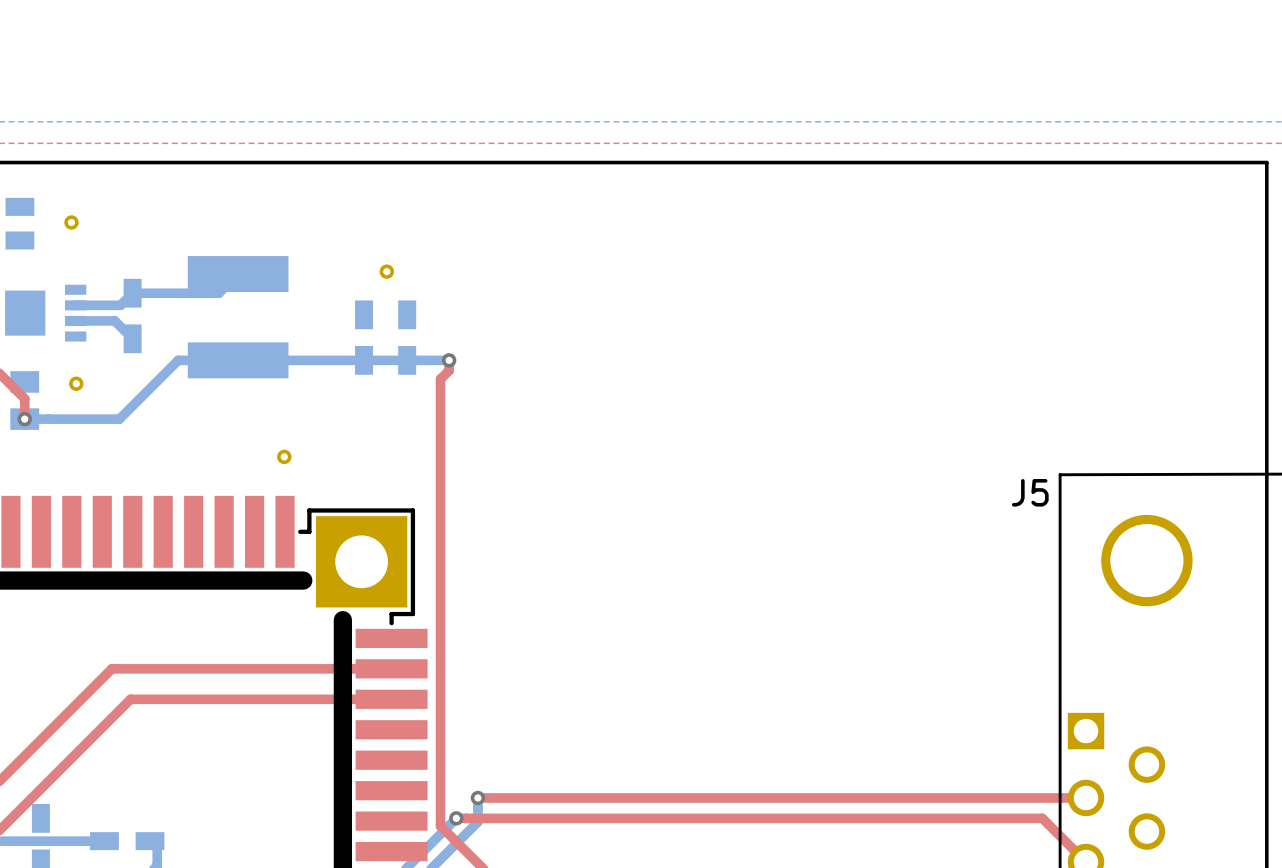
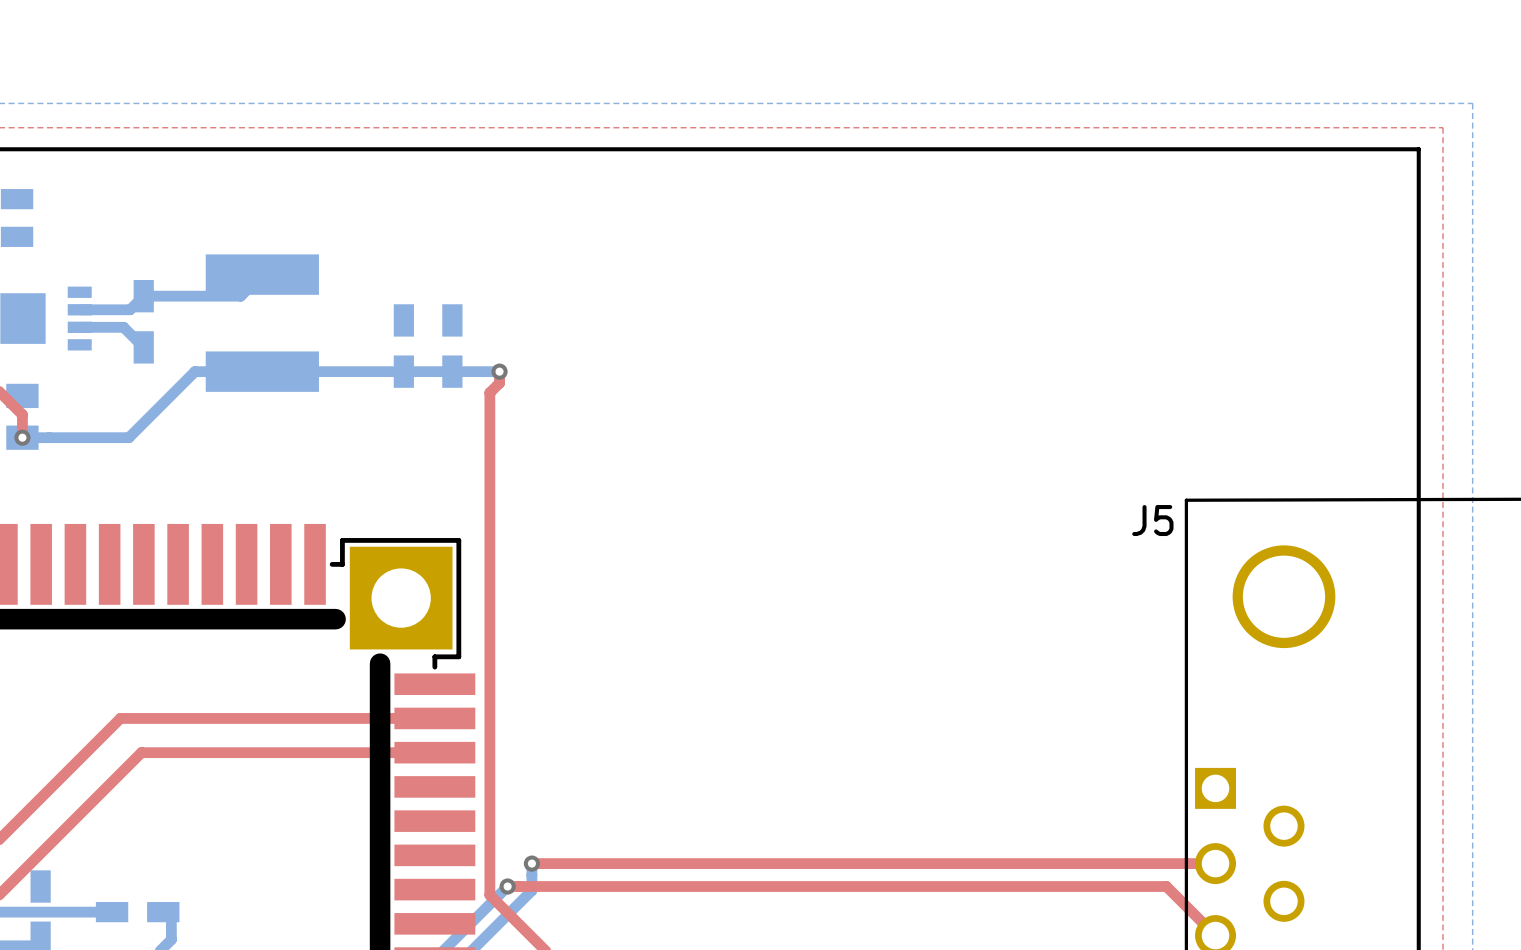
part: (71, 222) -> none
part: (386, 271) -> none
part: (76, 383) -> none
part: (284, 456) -> none

